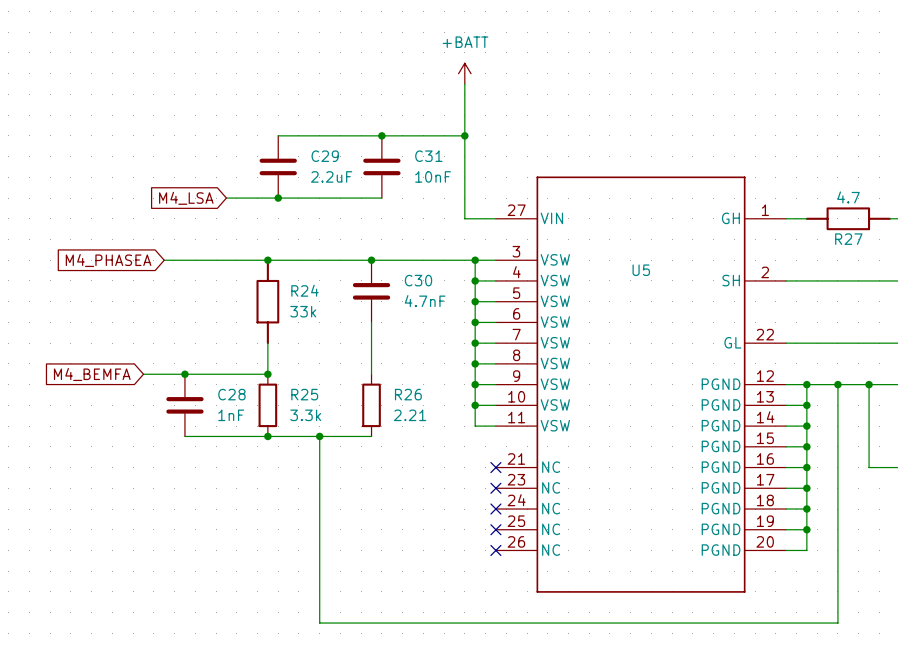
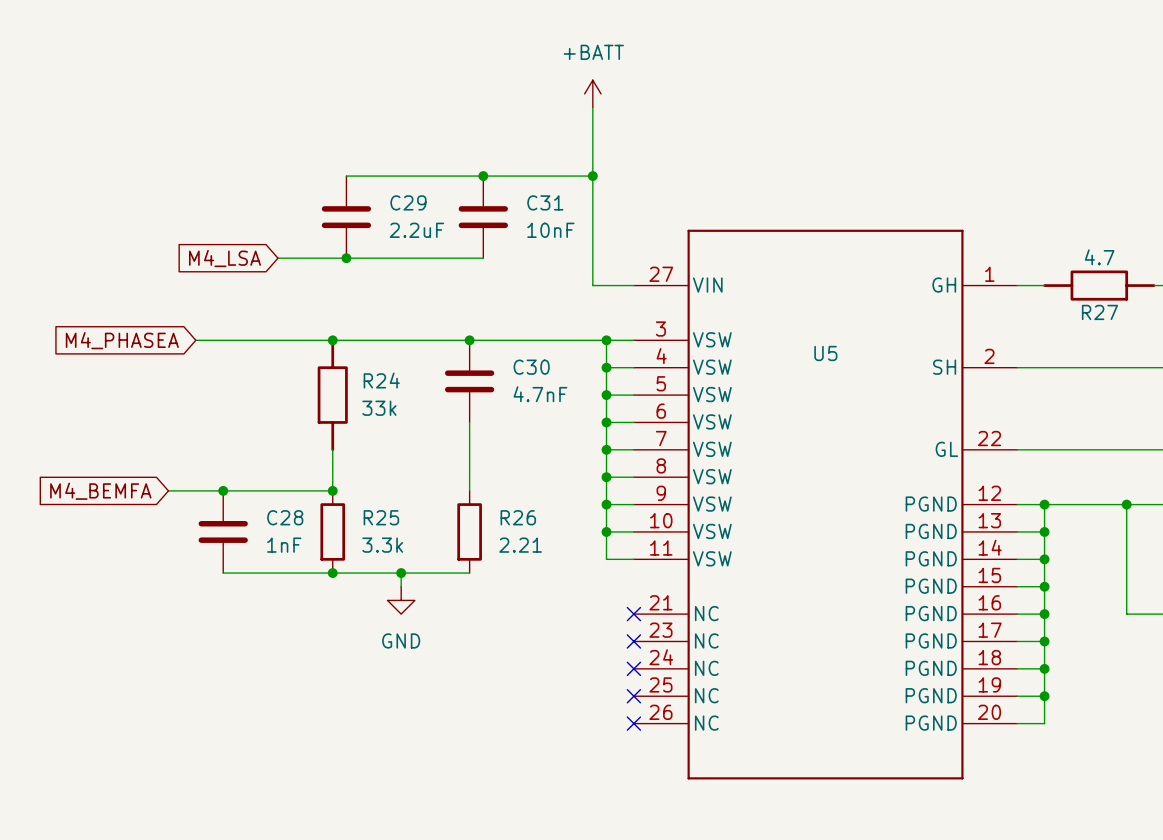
wire: (837, 384) (837, 623) (319, 623) (319, 446) -> none
junction: (837, 384) -> none
power symbol: none -> GND (401, 600)

